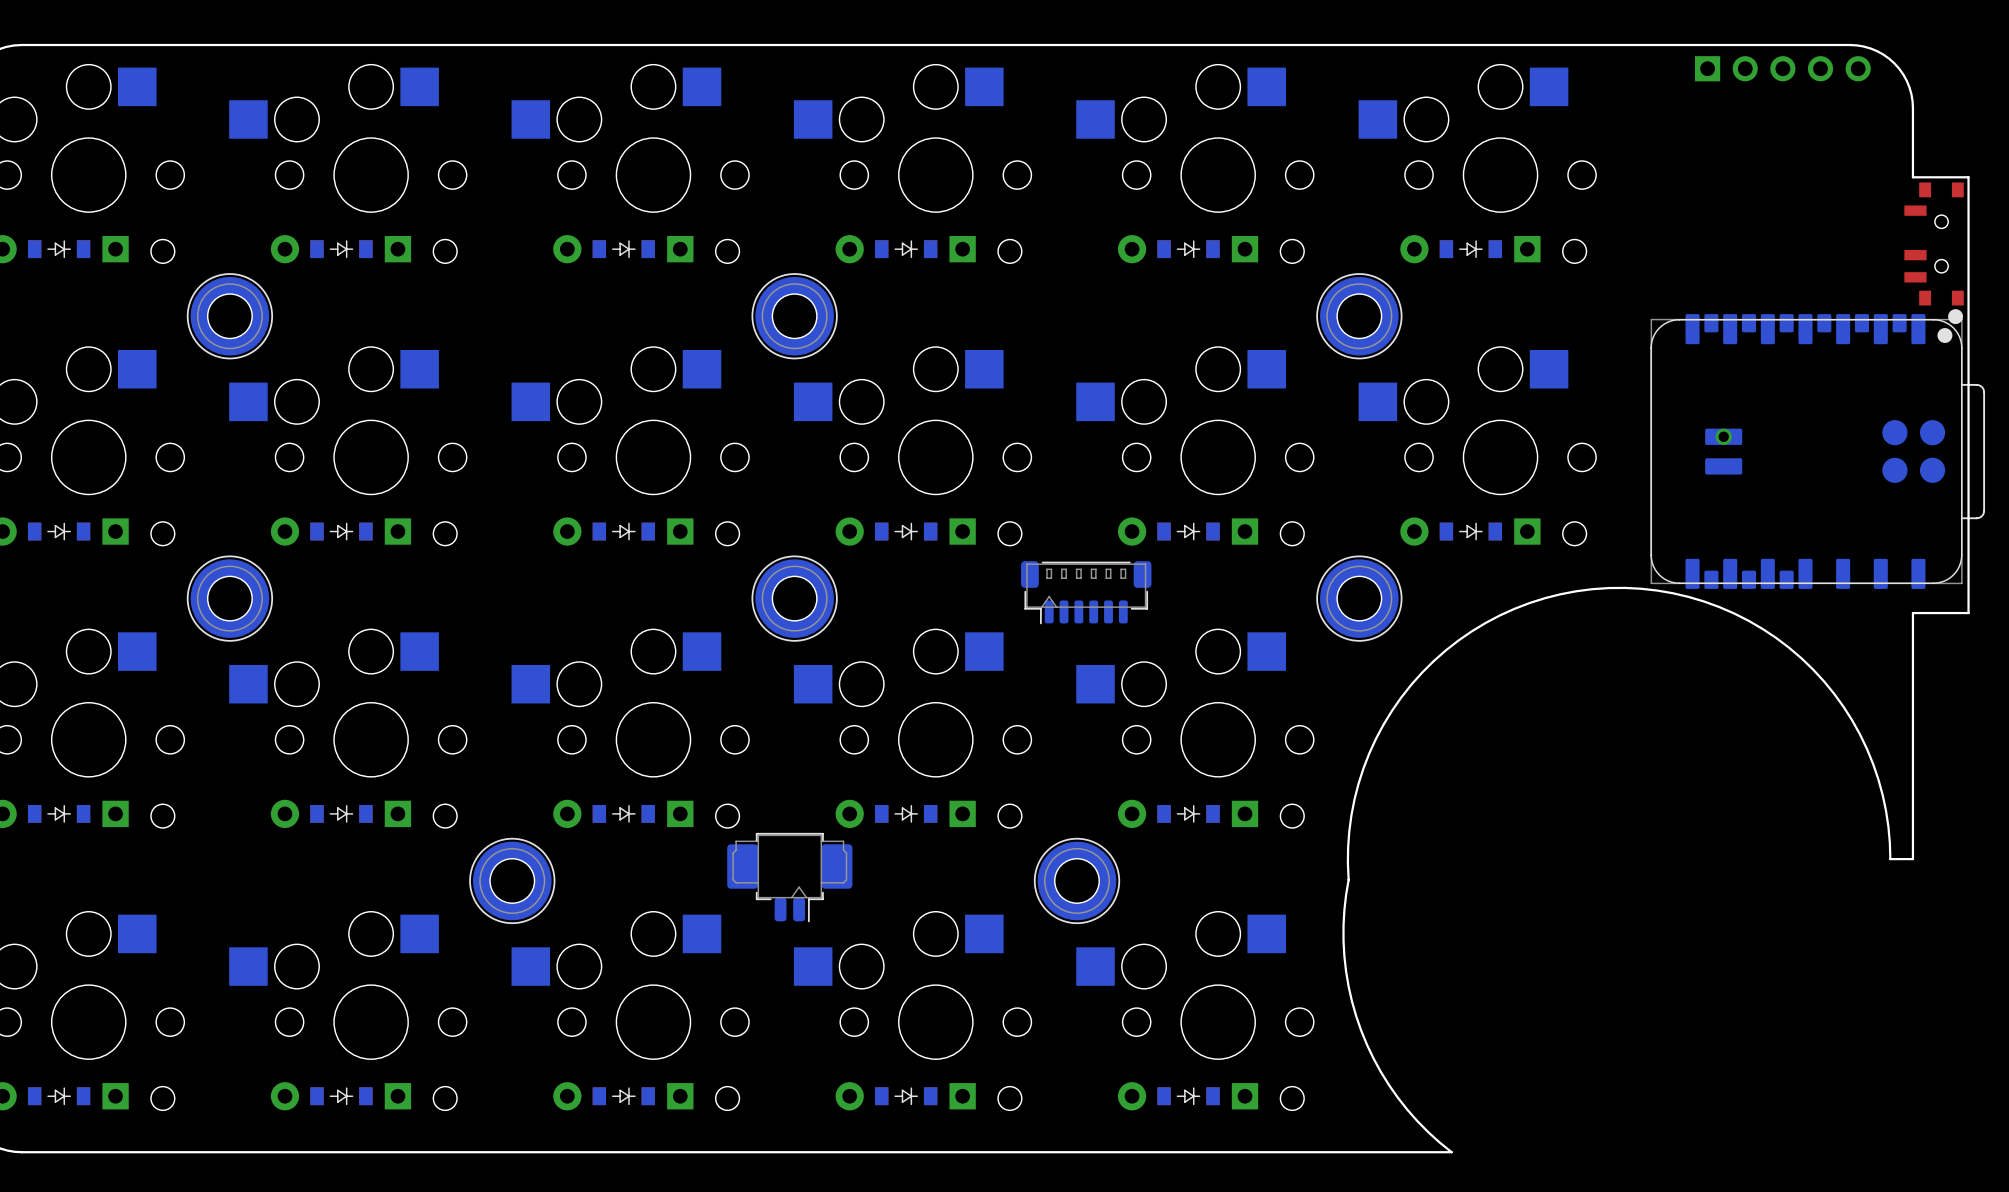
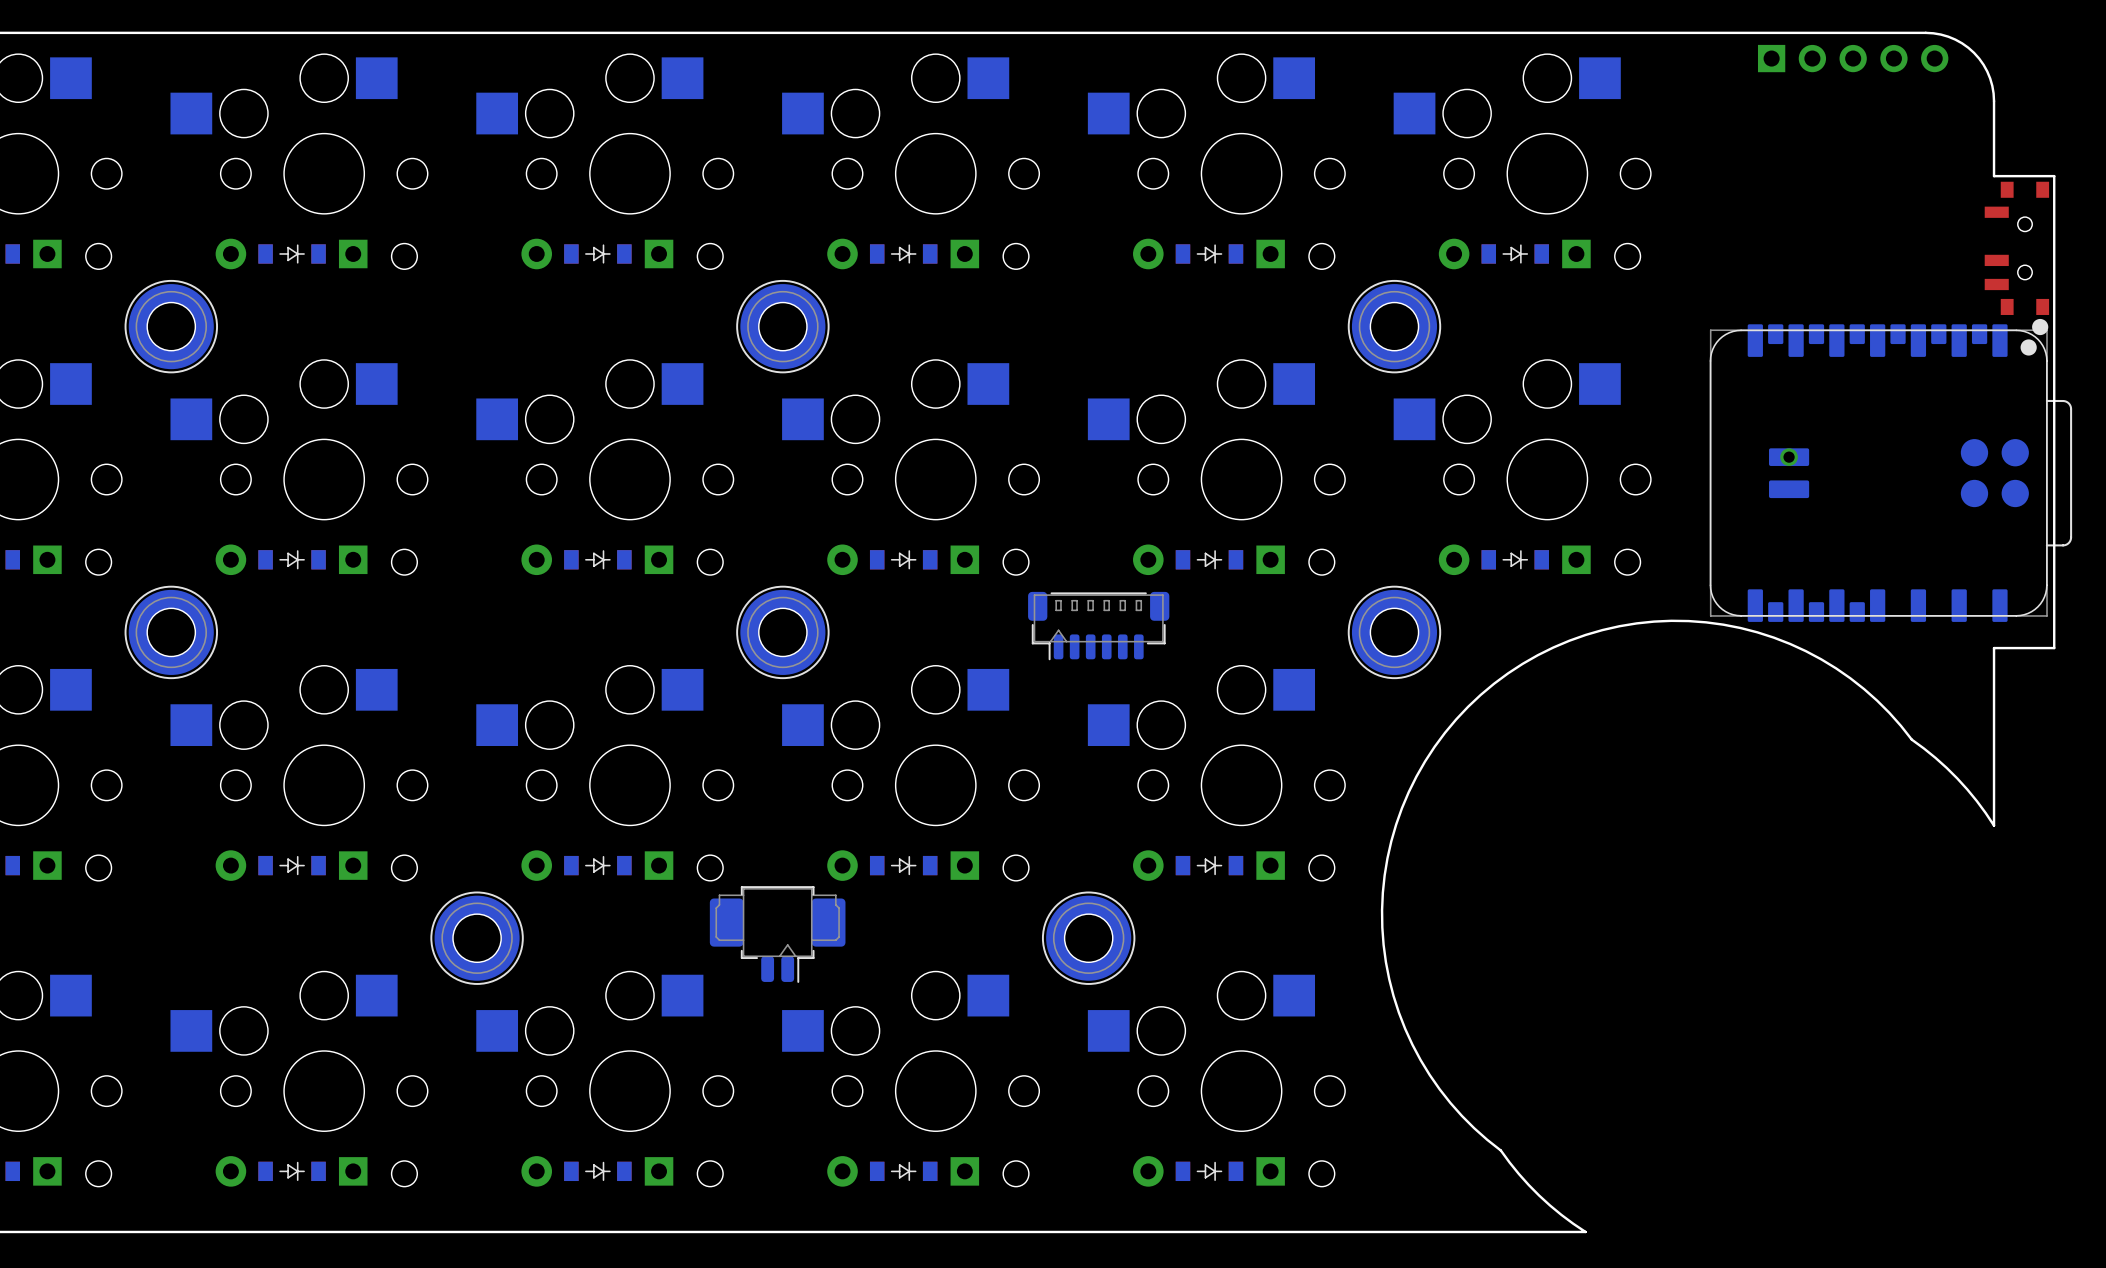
board edge: (1912, 613) (1912, 859) (1890, 859) (1886, 810) (1873, 764) (1860, 734) (1834, 693) (1801, 658) (1776, 637) (1748, 620) (1704, 601) (1657, 590) (1624, 587) (1576, 591) (1545, 598) (1514, 608) (1471, 631) (1433, 661) (1411, 684) (1392, 710) (1376, 738) (1363, 768) (1354, 799) (1348, 847) (1348, 879) (1343, 925) (1344, 956) (1348, 986) (1356, 1016) (1367, 1044) (1381, 1072) (1407, 1109) (1428, 1132) (1451, 1152) -> (1994, 648) (1994, 825) (1976, 801) (1957, 778) (1935, 757) (1911, 739) (1877, 700) (1850, 678) (1821, 659) (1790, 643) (1740, 627) (1706, 622) (1671, 620) (1619, 626) (1585, 634) (1553, 647) (1508, 673) (1480, 694) (1456, 719) (1434, 746) (1416, 776) (1401, 808) (1391, 841) (1384, 875) (1382, 910) (1383, 944) (1389, 979) (1398, 1012) (1412, 1044) (1439, 1089) (1474, 1128) (1500, 1150) (1539, 1195) (1585, 1231) (1494, 1231)

